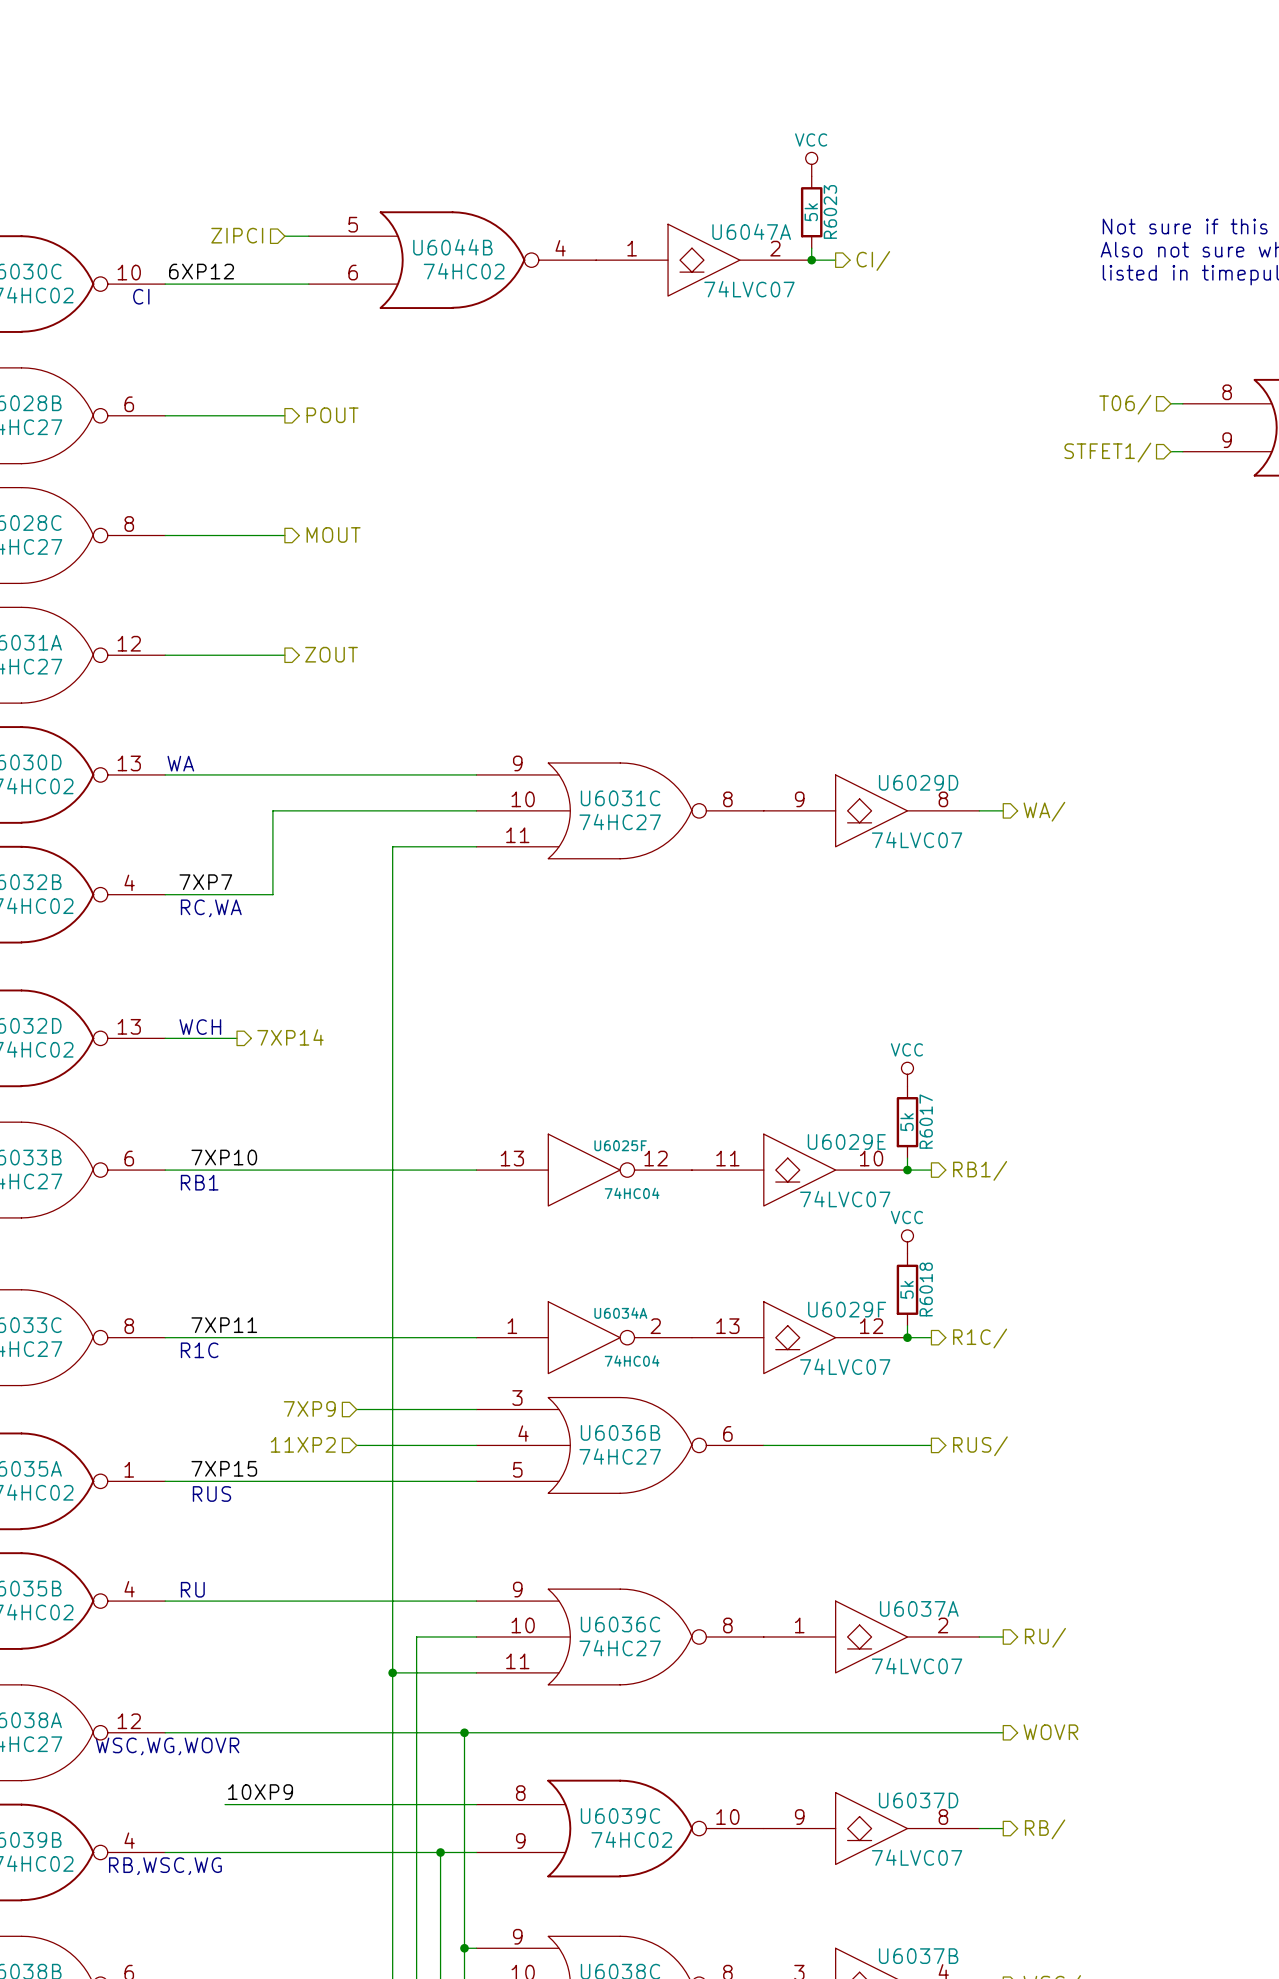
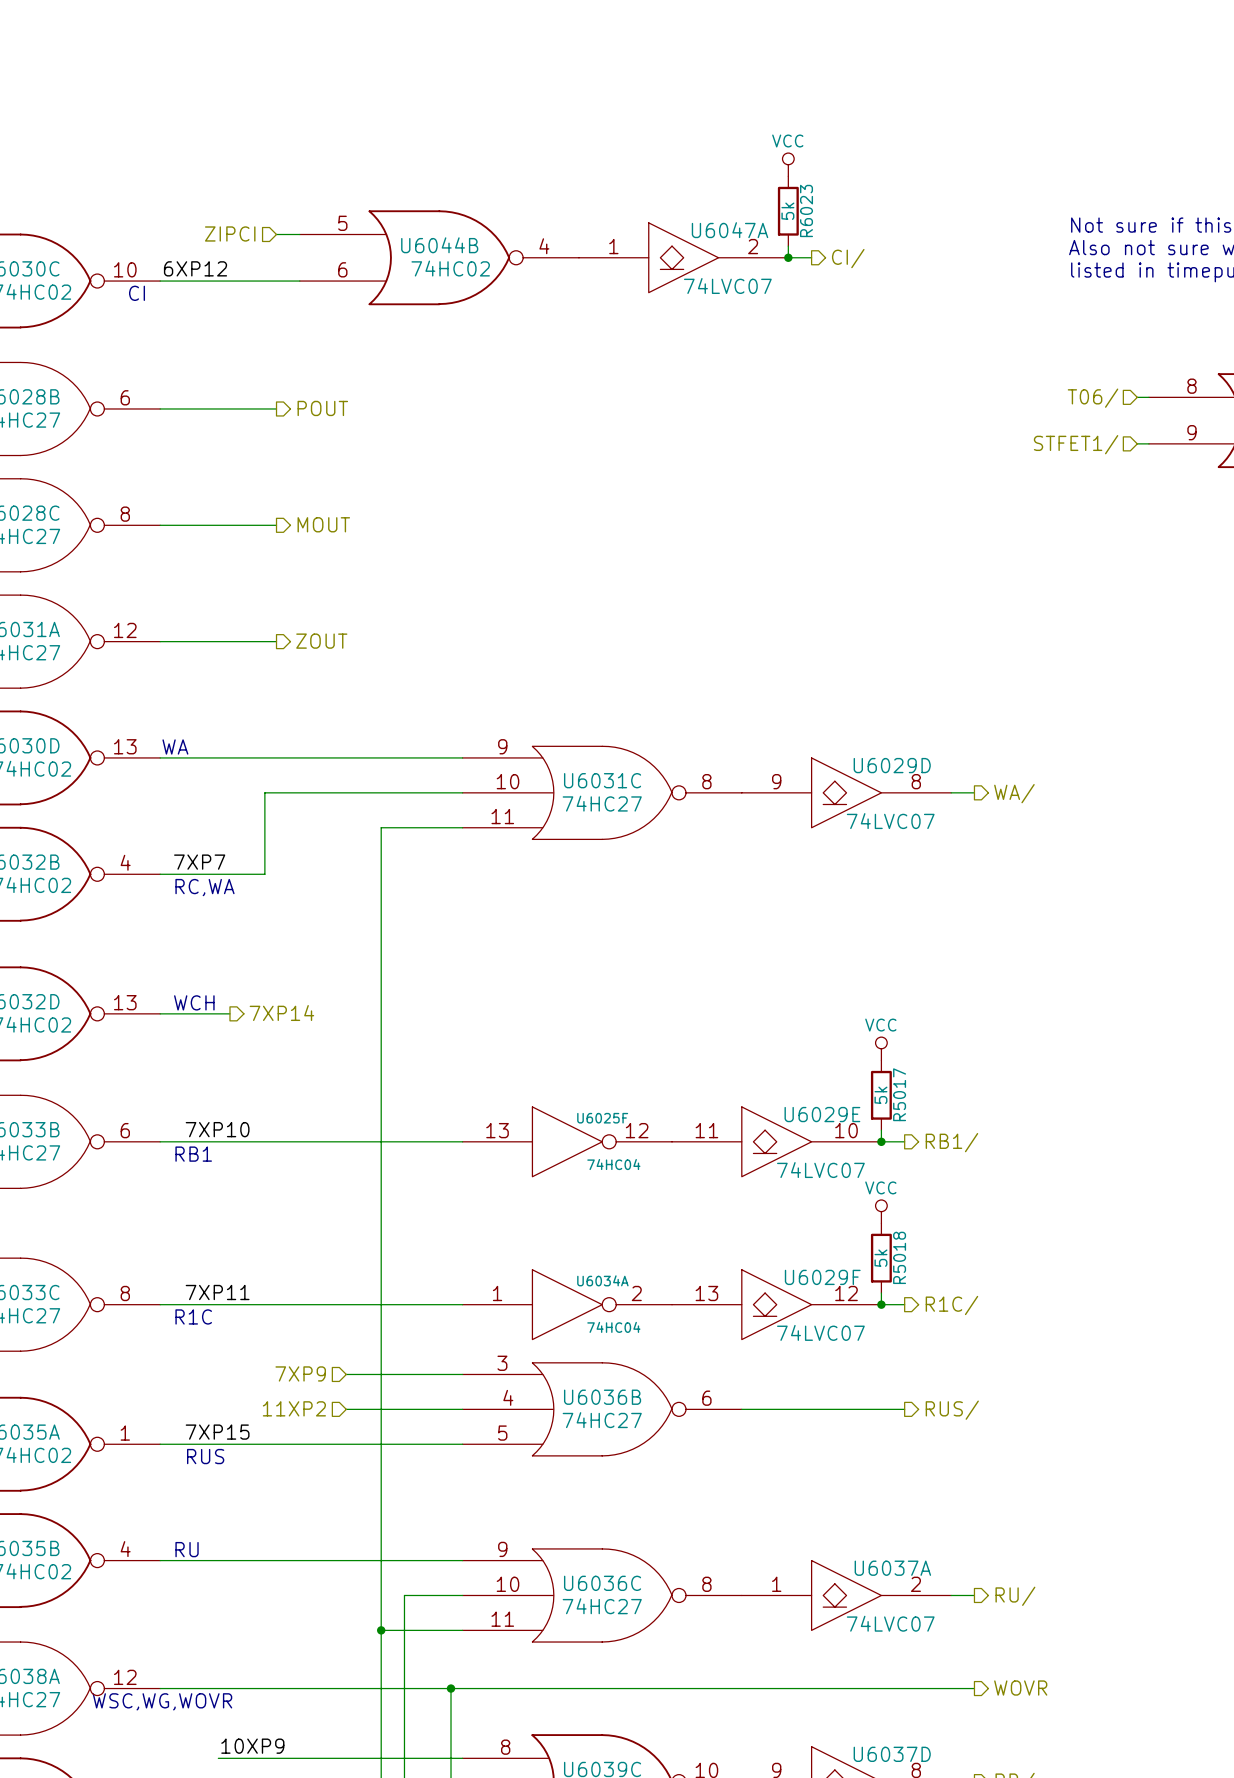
R6017 name: R6017 (926, 1121) -> R5017 (899, 1094)
R6018 name: R6018 (926, 1289) -> R5018 (899, 1257)

